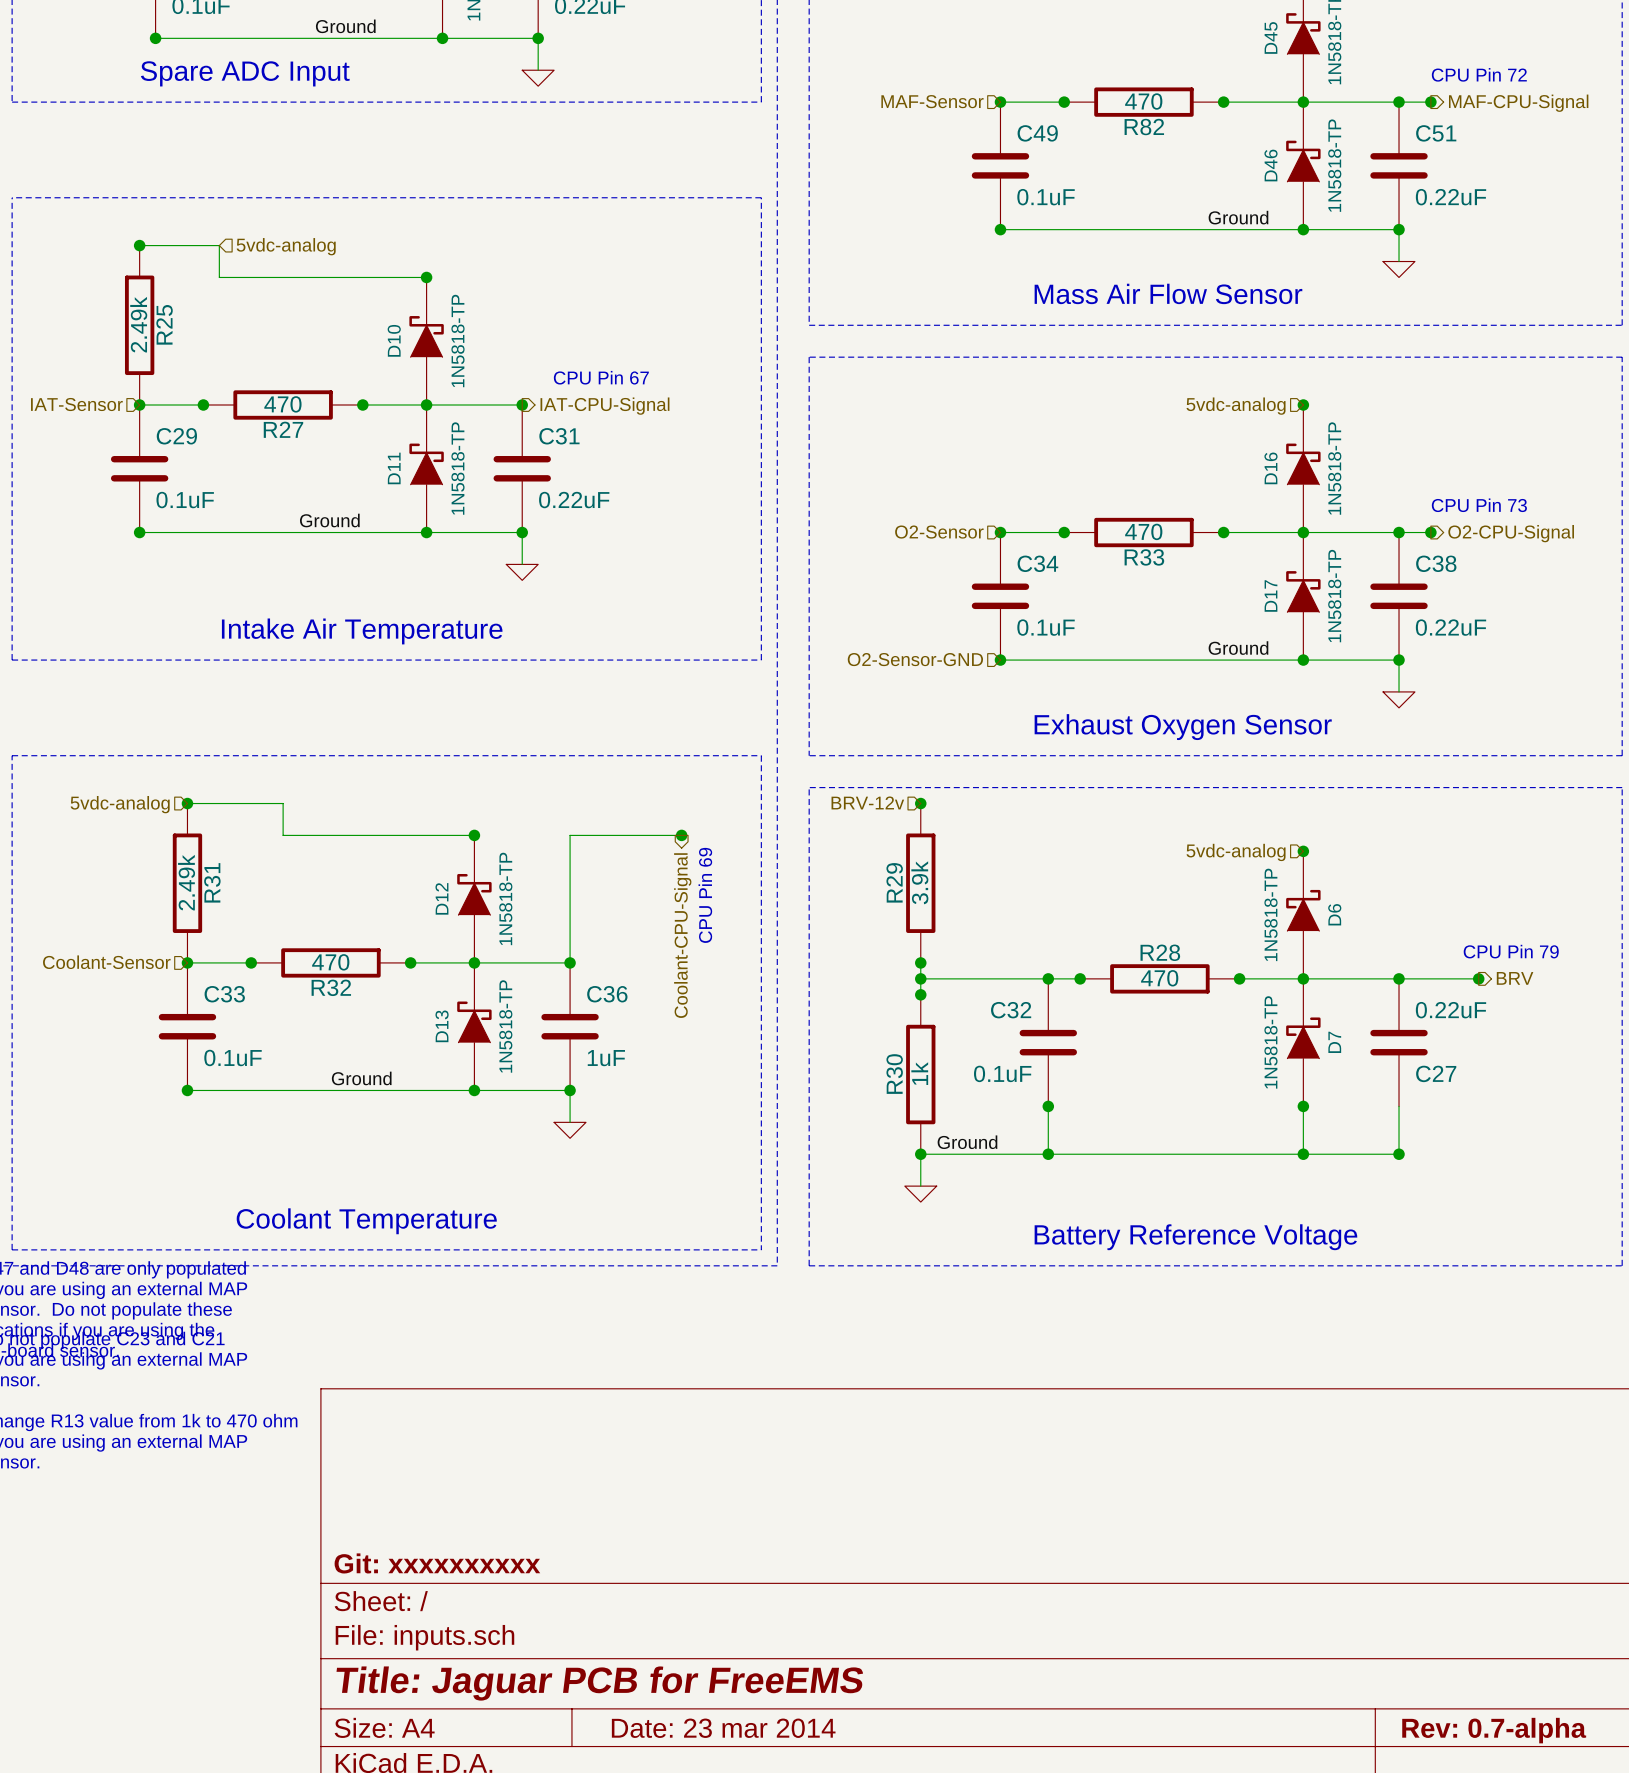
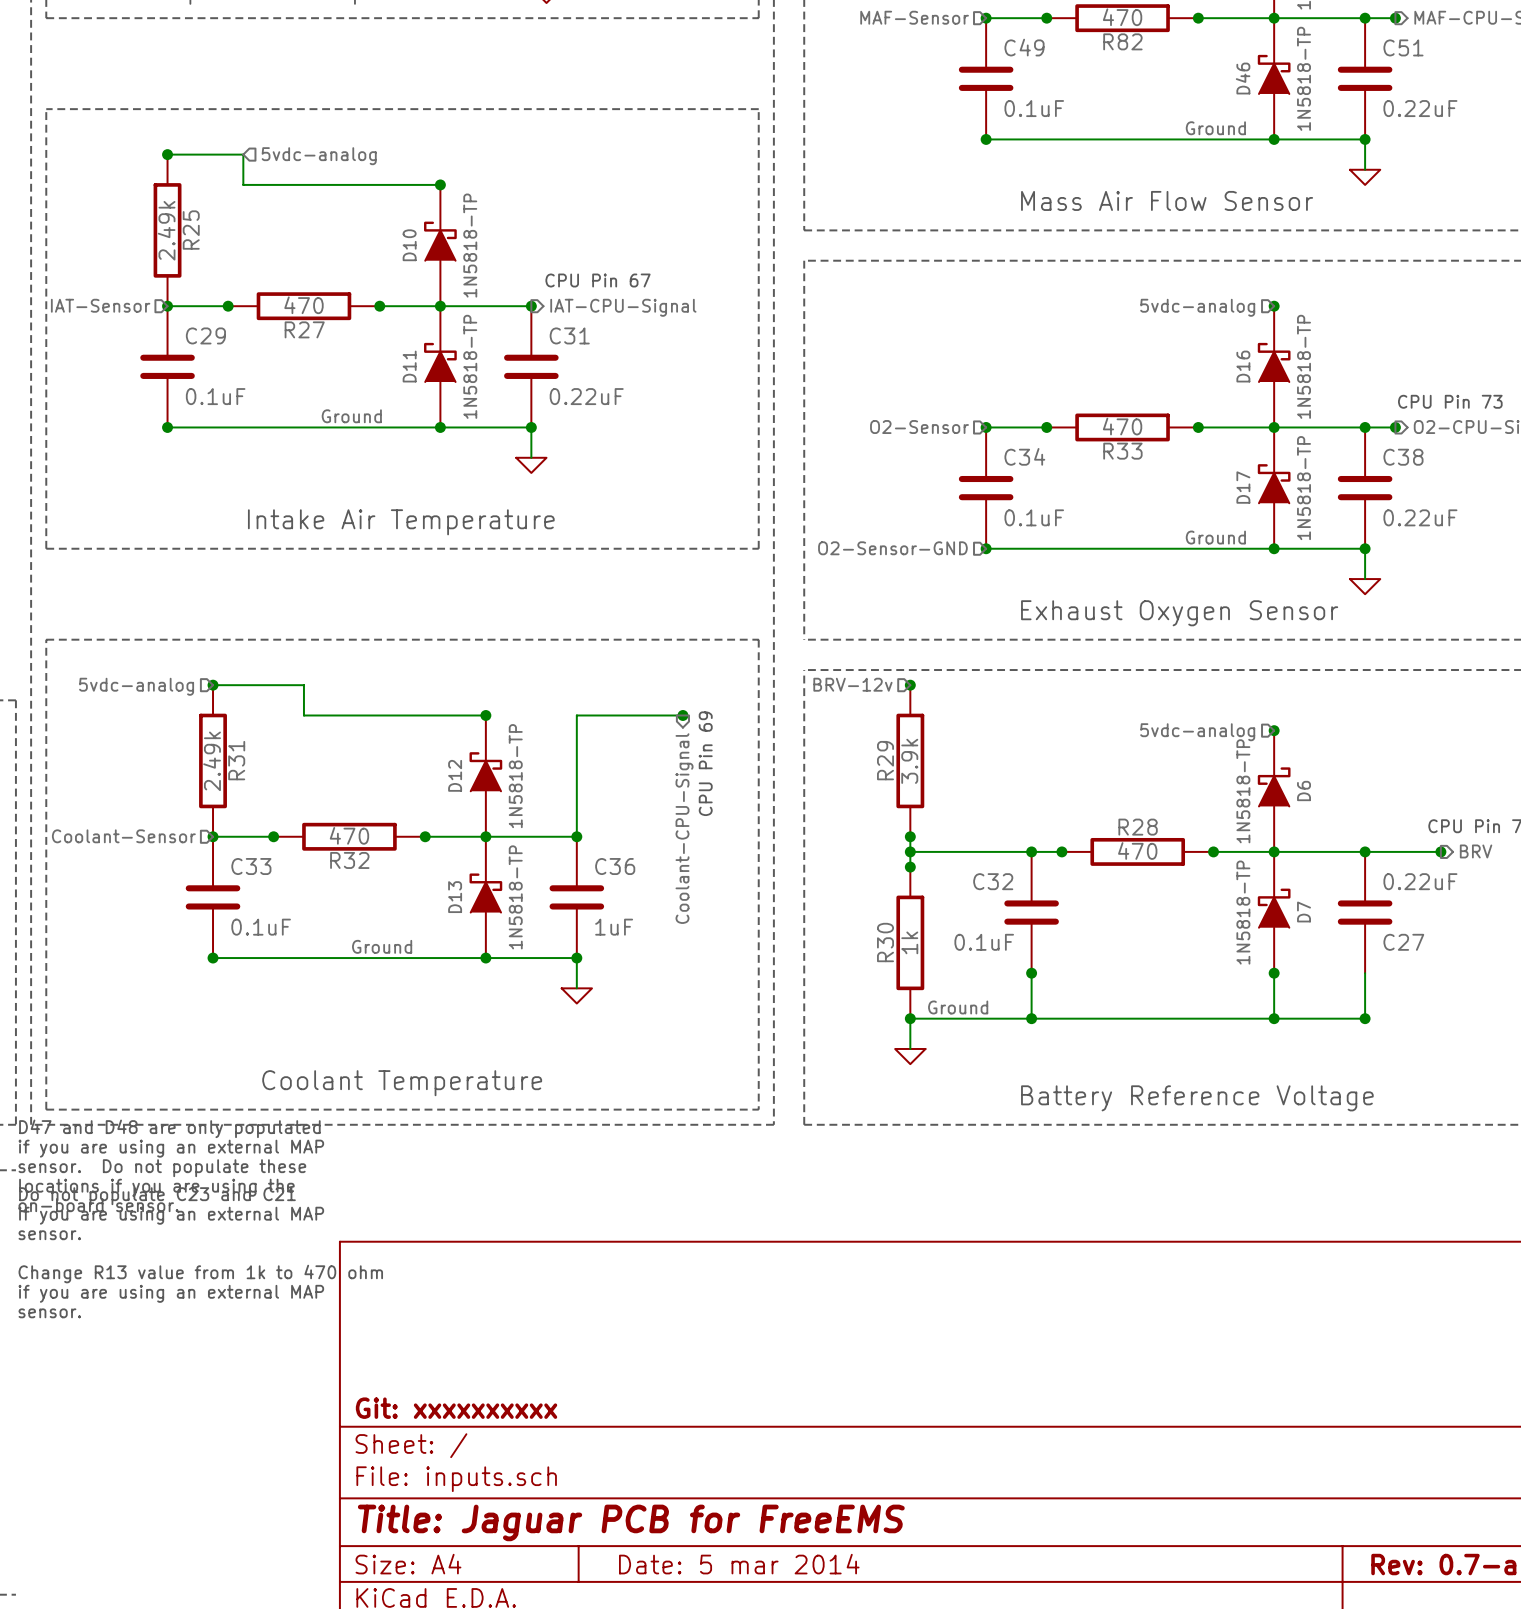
title block: Date: 23 mar 2014 (723, 1728) -> Date: 5 mar 2014 (739, 1564)

